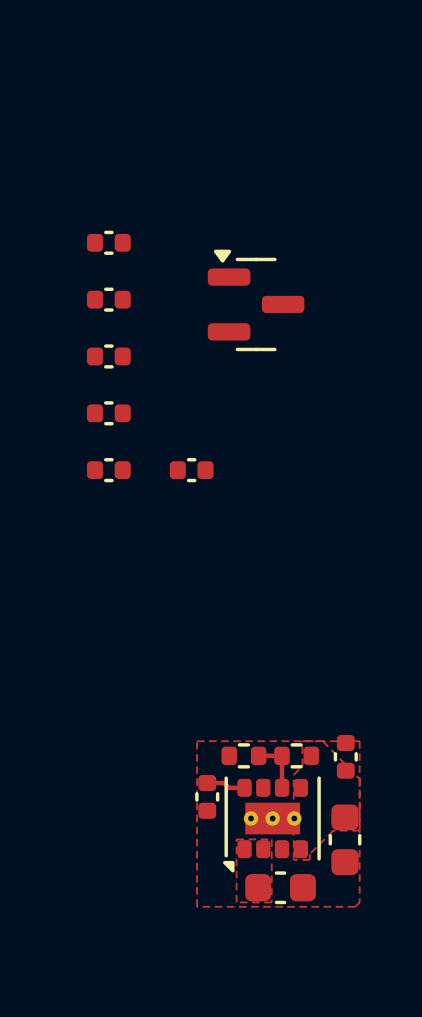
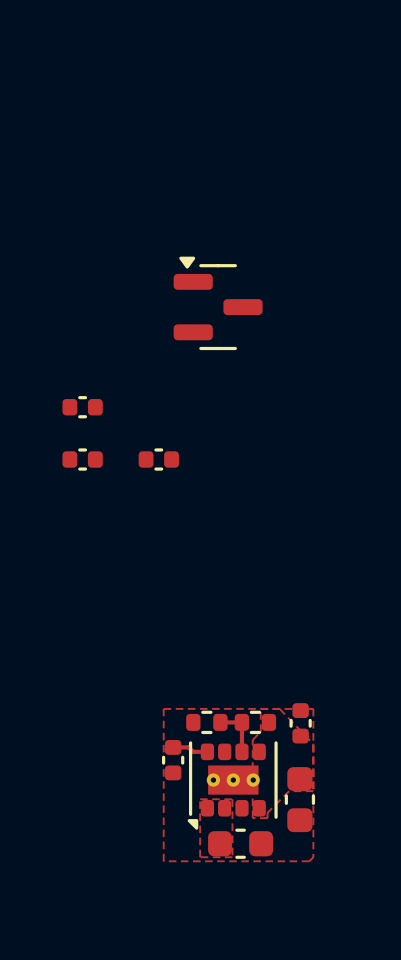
part: (108, 242) -> none
part: (108, 299) -> none
part: (108, 356) -> none

